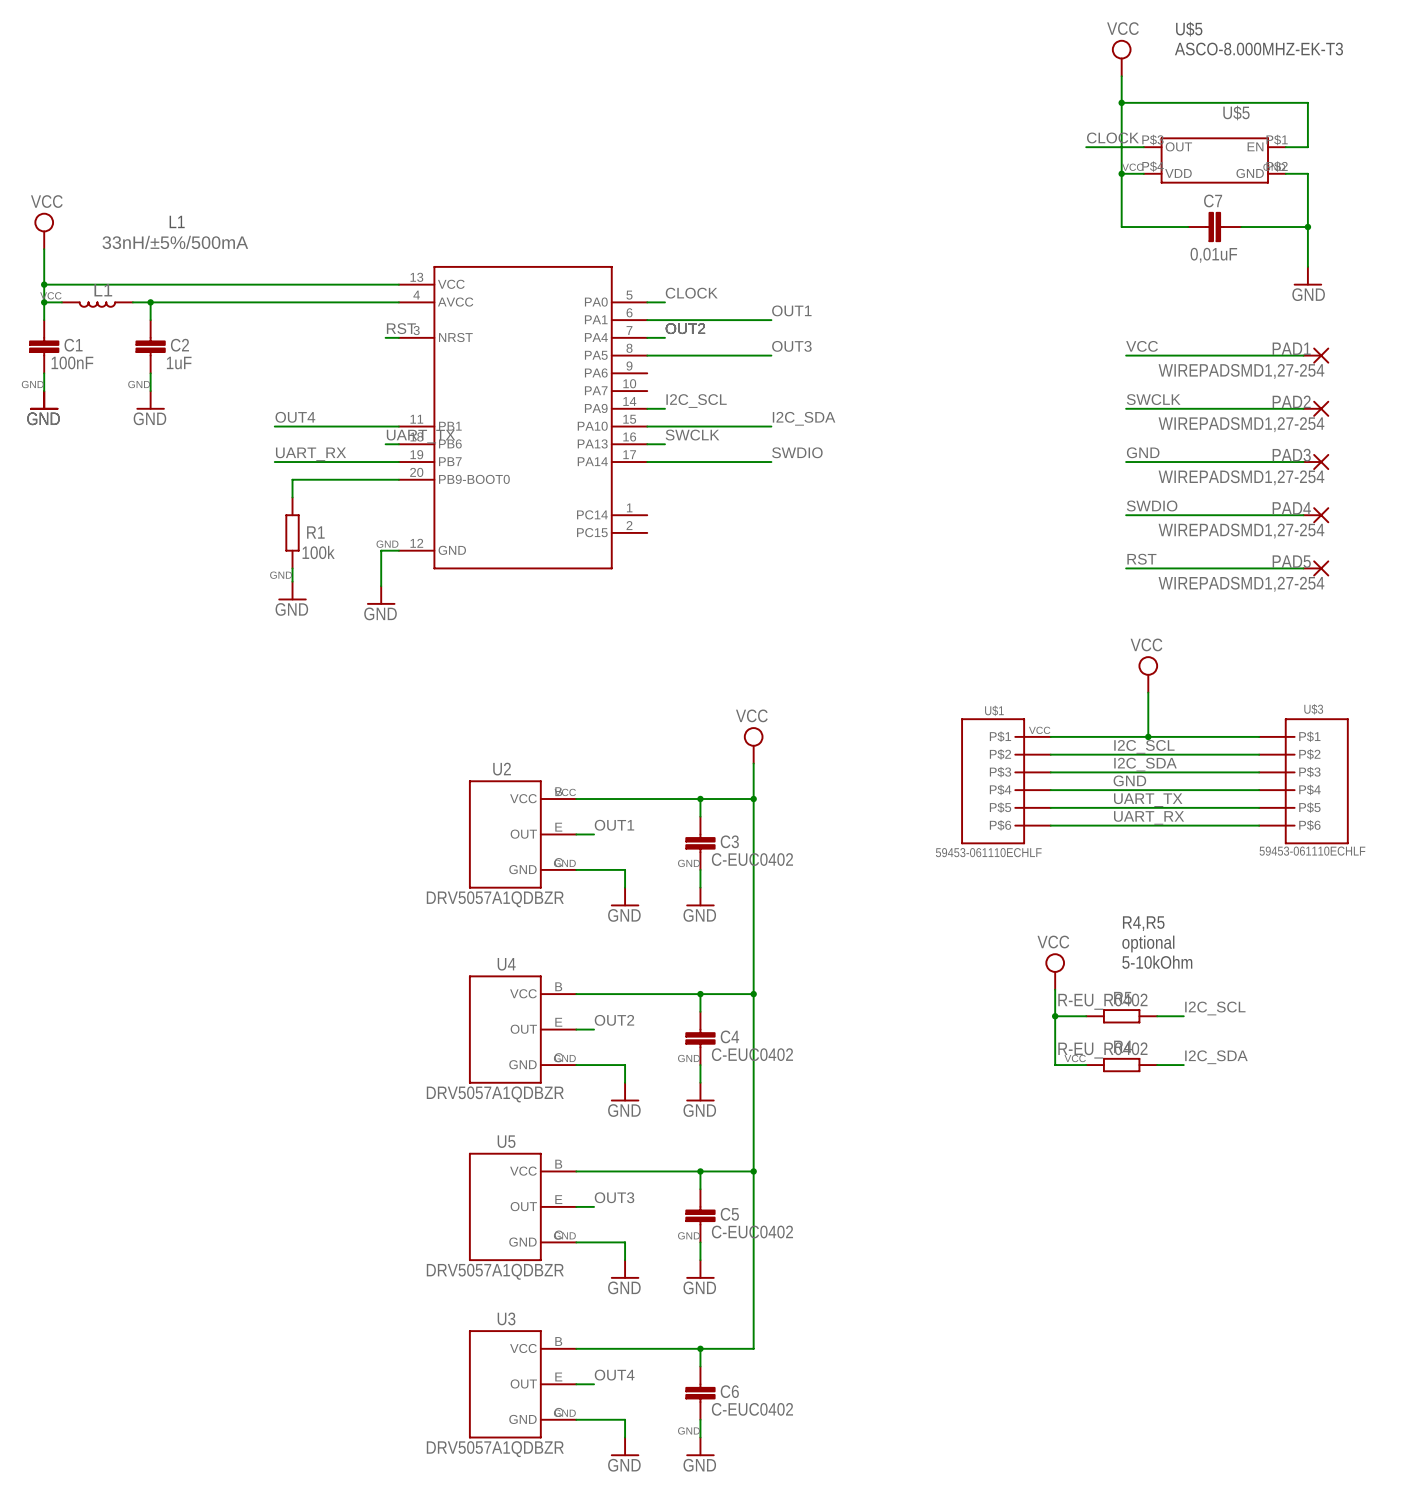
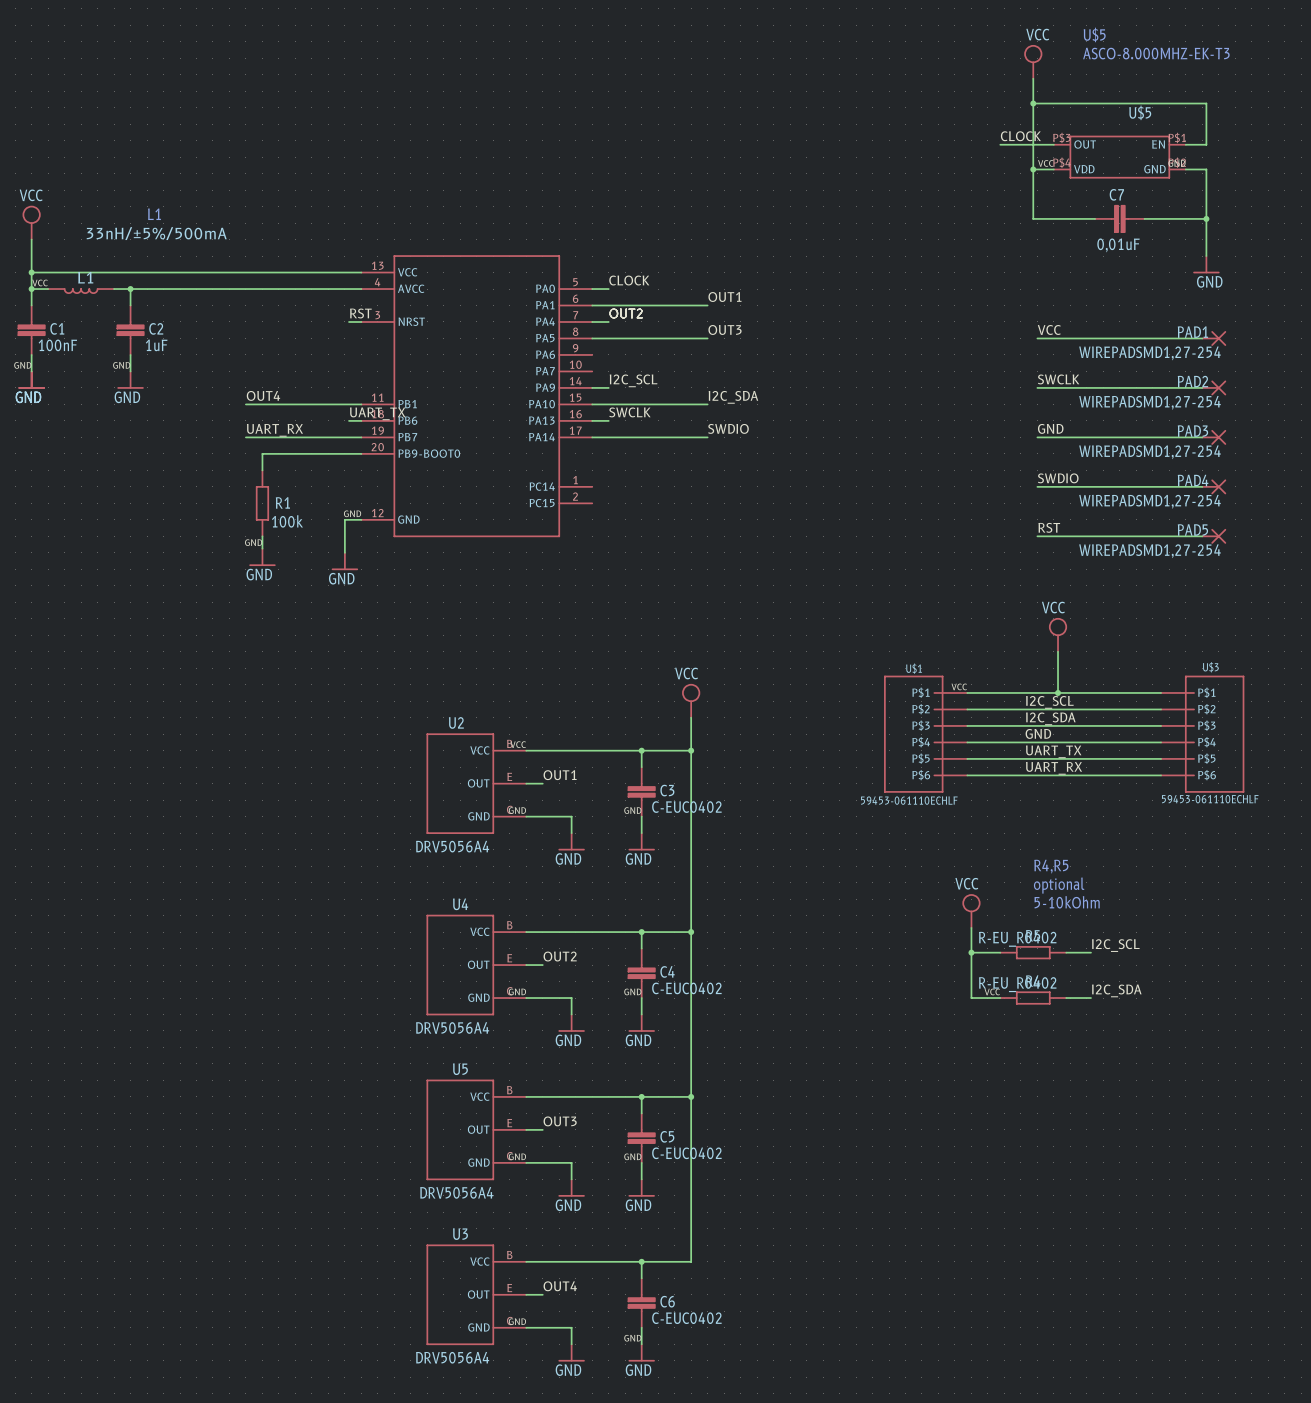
U2 value: DRV5057A1QDBZR (495, 899) -> DRV5056A4 (452, 846)
U4 value: DRV5057A1QDBZR (495, 1094) -> DRV5056A4 (452, 1028)
U5 value: DRV5057A1QDBZR (495, 1271) -> DRV5056A4 (456, 1192)
U3 value: DRV5057A1QDBZR (495, 1449) -> DRV5056A4 (452, 1357)

